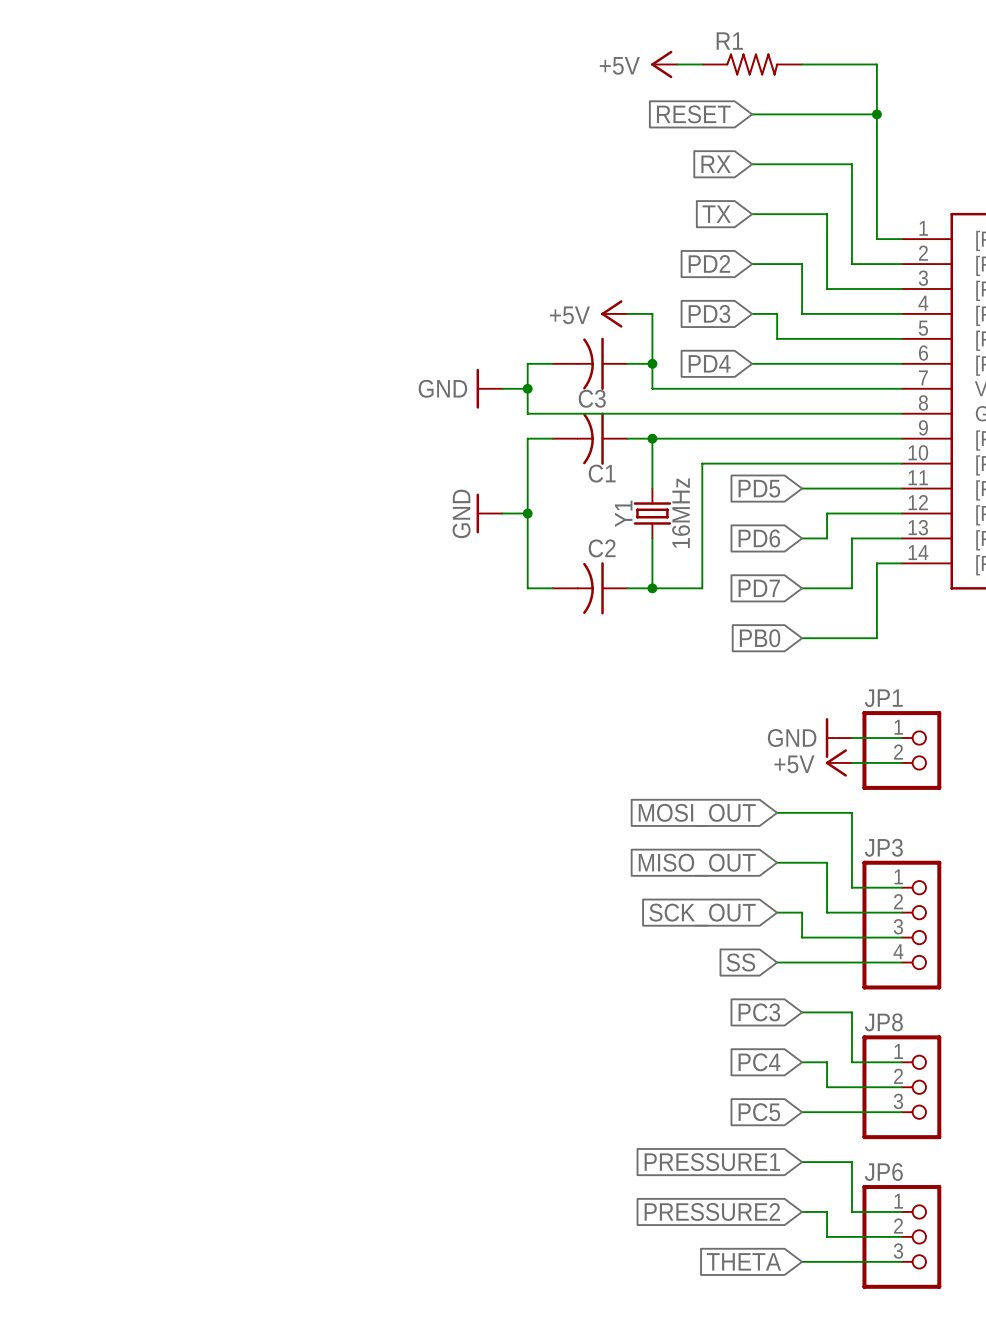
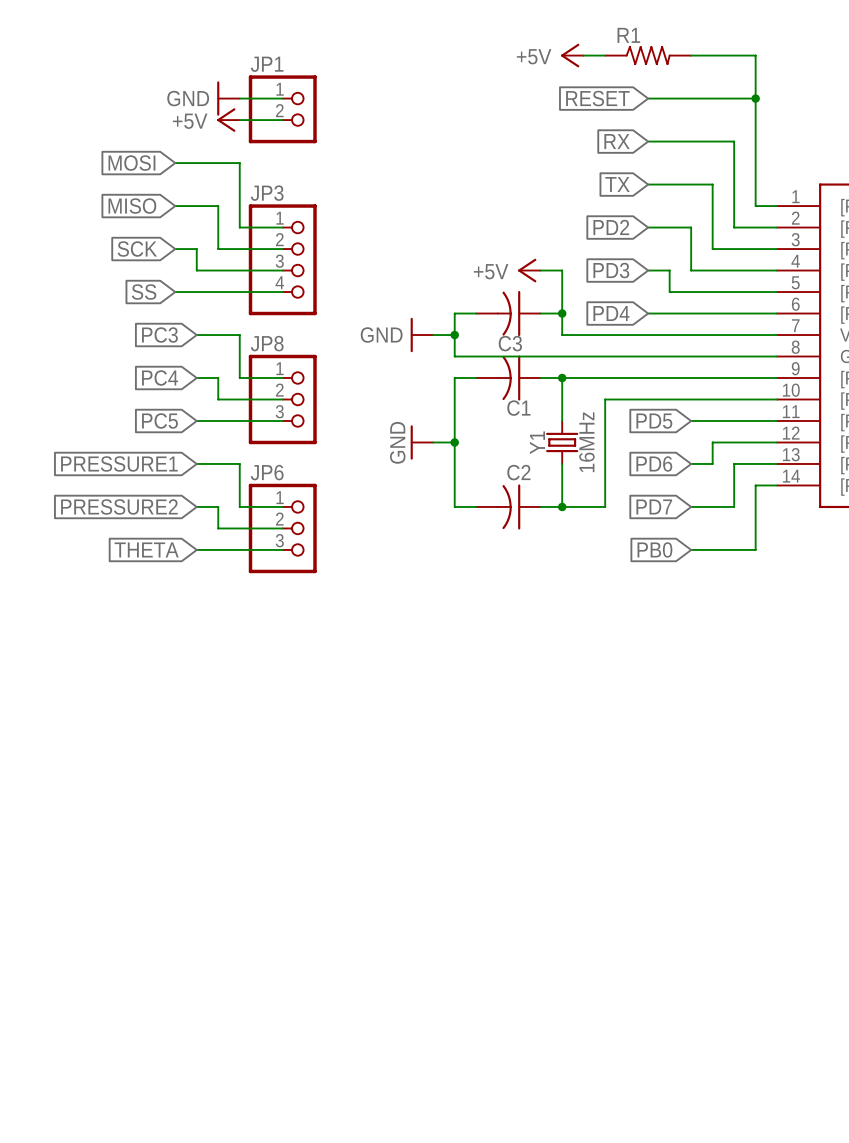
power symbol: none -> GND (228, 98)
wire: none -> (239, 98) (282, 98)
power symbol: none -> +5V (228, 120)
wire: none -> (239, 120) (282, 120)
global label: none -> MOSI (131, 163)
wire: none -> (175, 163) (239, 163) (239, 227) (282, 227)
global label: none -> MISO (132, 206)
wire: none -> (175, 206) (218, 206) (218, 249) (282, 249)
global label: none -> SCK (137, 249)
wire: none -> (175, 249) (196, 249) (196, 270) (282, 270)
global label: none -> SS (144, 292)
wire: none -> (175, 292) (282, 292)
global label: none -> PC3 (159, 335)
wire: none -> (196, 335) (239, 335) (239, 378) (282, 378)
global label: none -> PC4 (160, 378)
wire: none -> (196, 378) (218, 378) (218, 399) (282, 399)
global label: none -> PC5 (159, 420)
wire: none -> (196, 420) (282, 420)
global label: none -> PRESSURE1 (119, 463)
wire: none -> (196, 463) (239, 463) (239, 506) (282, 506)
global label: none -> PRESSURE2 (119, 506)
wire: none -> (196, 506) (218, 506) (218, 528) (282, 528)
global label: none -> THETA (146, 549)
wire: none -> (196, 549) (282, 549)
power symbol: GND (838, 738) -> none
wire: (851, 738) (901, 738) -> none
JP1 position: (901, 750) -> (282, 109)
power symbol: +5V (838, 762) -> none
wire: (851, 762) (901, 762) -> none
wire: (777, 812) (851, 812) (851, 887) (901, 887) -> none
global label: MOSI_OUT (697, 815) -> none
wire: (777, 862) (827, 862) (827, 912) (901, 912) -> none
global label: MISO_OUT (697, 865) -> none
wire: (777, 912) (802, 912) (802, 937) (901, 937) -> none
global label: SCK_OUT (702, 915) -> none
JP3 position: (901, 925) -> (282, 259)
global label: SS (740, 962) -> none
wire: (777, 962) (901, 962) -> none
global label: PC3 (759, 1012) -> none
wire: (802, 1012) (851, 1012) (851, 1062) (901, 1062) -> none
global label: PC4 (759, 1062) -> none
wire: (802, 1062) (827, 1062) (827, 1087) (901, 1087) -> none
JP8 position: (901, 1087) -> (282, 399)
global label: PC5 (759, 1112) -> none
wire: (802, 1112) (901, 1112) -> none
global label: PRESSURE1 (712, 1162) -> none
wire: (802, 1162) (851, 1162) (851, 1211) (901, 1211) -> none
global label: PRESSURE2 (712, 1211) -> none
wire: (802, 1211) (827, 1211) (827, 1236) (901, 1236) -> none
JP6 position: (901, 1236) -> (282, 528)
global label: THETA (743, 1261) -> none
wire: (802, 1261) (901, 1261) -> none

